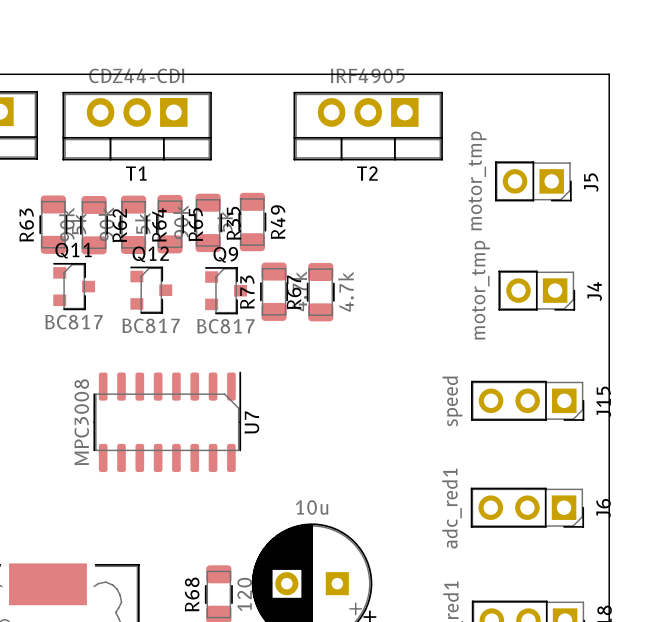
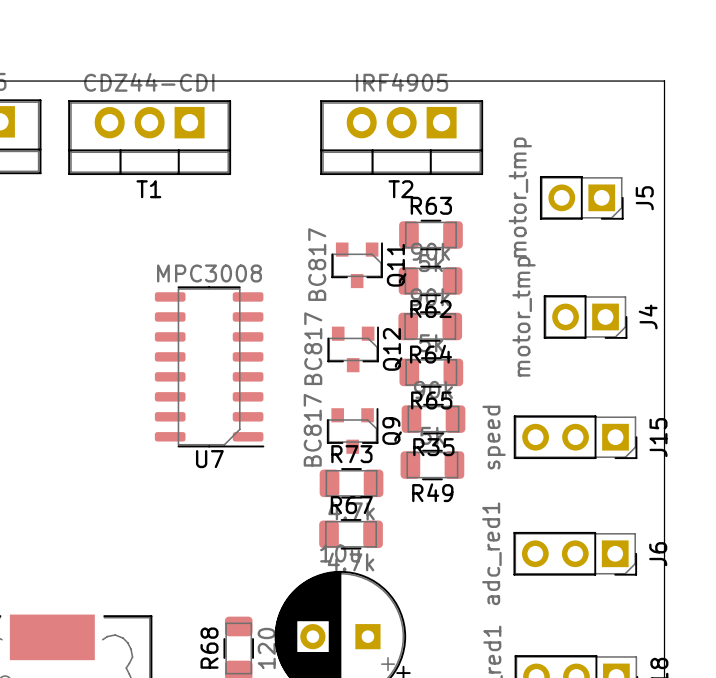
R35 rotation: 0° (208, 222) -> 90° clockwise (433, 419)
R35 position: (208, 222) -> (433, 419)
R49 rotation: 0° (252, 222) -> 90° clockwise (432, 465)
R49 position: (252, 222) -> (432, 465)
R63 rotation: 0° (53, 224) -> 90° clockwise (430, 235)
R63 position: (53, 224) -> (430, 235)
R64 rotation: 0° (133, 224) -> 90° clockwise (430, 326)
R64 position: (133, 224) -> (430, 326)
R65 rotation: 0° (170, 224) -> 90° clockwise (431, 372)
R65 position: (170, 224) -> (431, 372)
R62 rotation: 0° (94, 225) -> 90° clockwise (430, 280)
R62 position: (94, 225) -> (430, 280)
Q11 rotation: 0° (74, 286) -> 90° clockwise (357, 265)
Q11 position: (74, 286) -> (357, 265)
Q12 rotation: 0° (151, 290) -> 90° clockwise (353, 349)
Q12 position: (151, 290) -> (353, 349)
Q9 rotation: 0° (226, 290) -> 90° clockwise (352, 430)
Q9 position: (226, 290) -> (352, 430)
R73 rotation: 0° (274, 291) -> 90° clockwise (351, 483)
R73 position: (274, 291) -> (351, 483)
R67 rotation: 0° (320, 292) -> 90° clockwise (351, 534)
R67 position: (320, 292) -> (351, 534)
U7 rotation: 0° (167, 421) -> 90° clockwise (209, 366)
U7 position: (167, 421) -> (209, 366)

